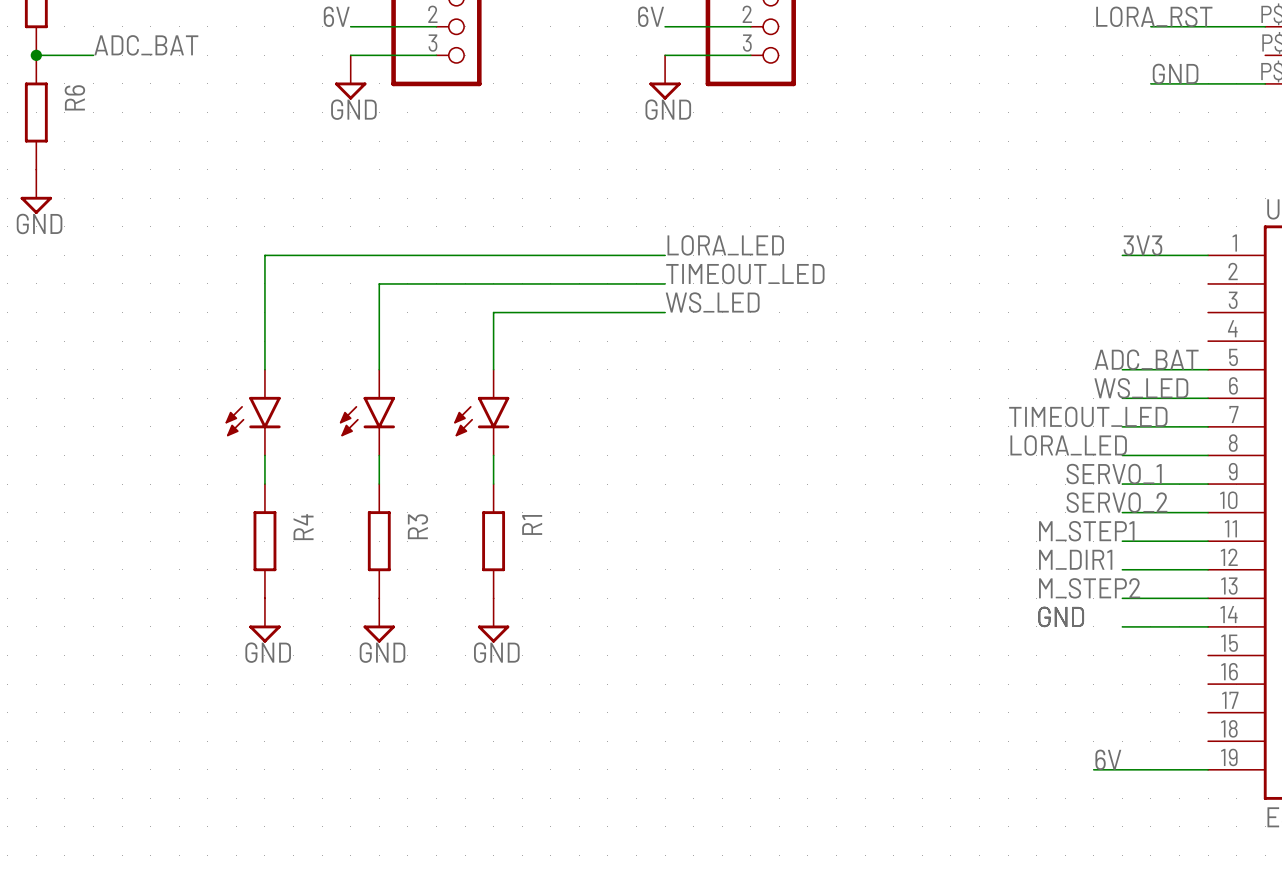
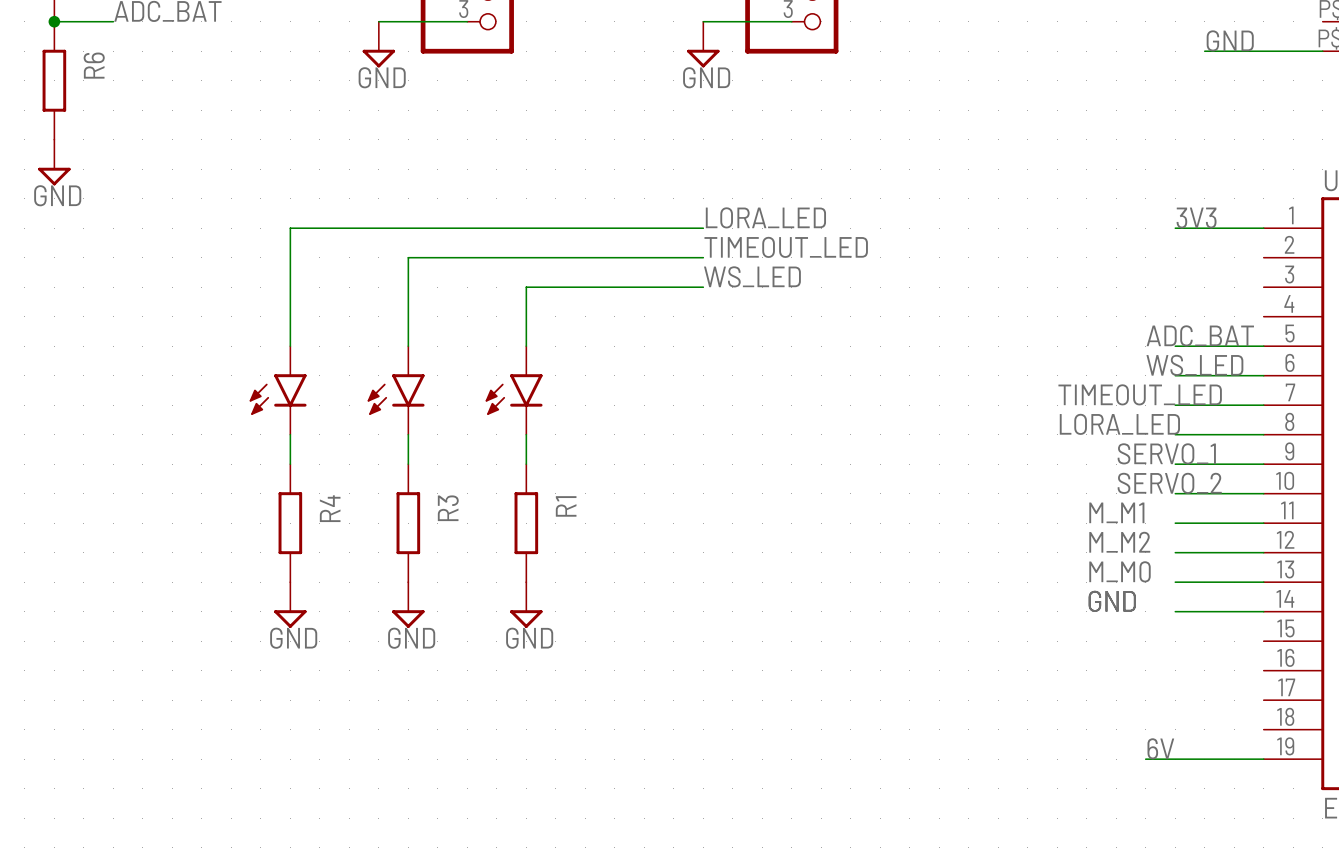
label: M_STEP1 (1086, 531) -> M_M1 (1116, 512)
label: M_DIR1 (1075, 559) -> M_M2 (1119, 542)
label: M_STEP2 (1089, 588) -> M_M0 (1119, 571)

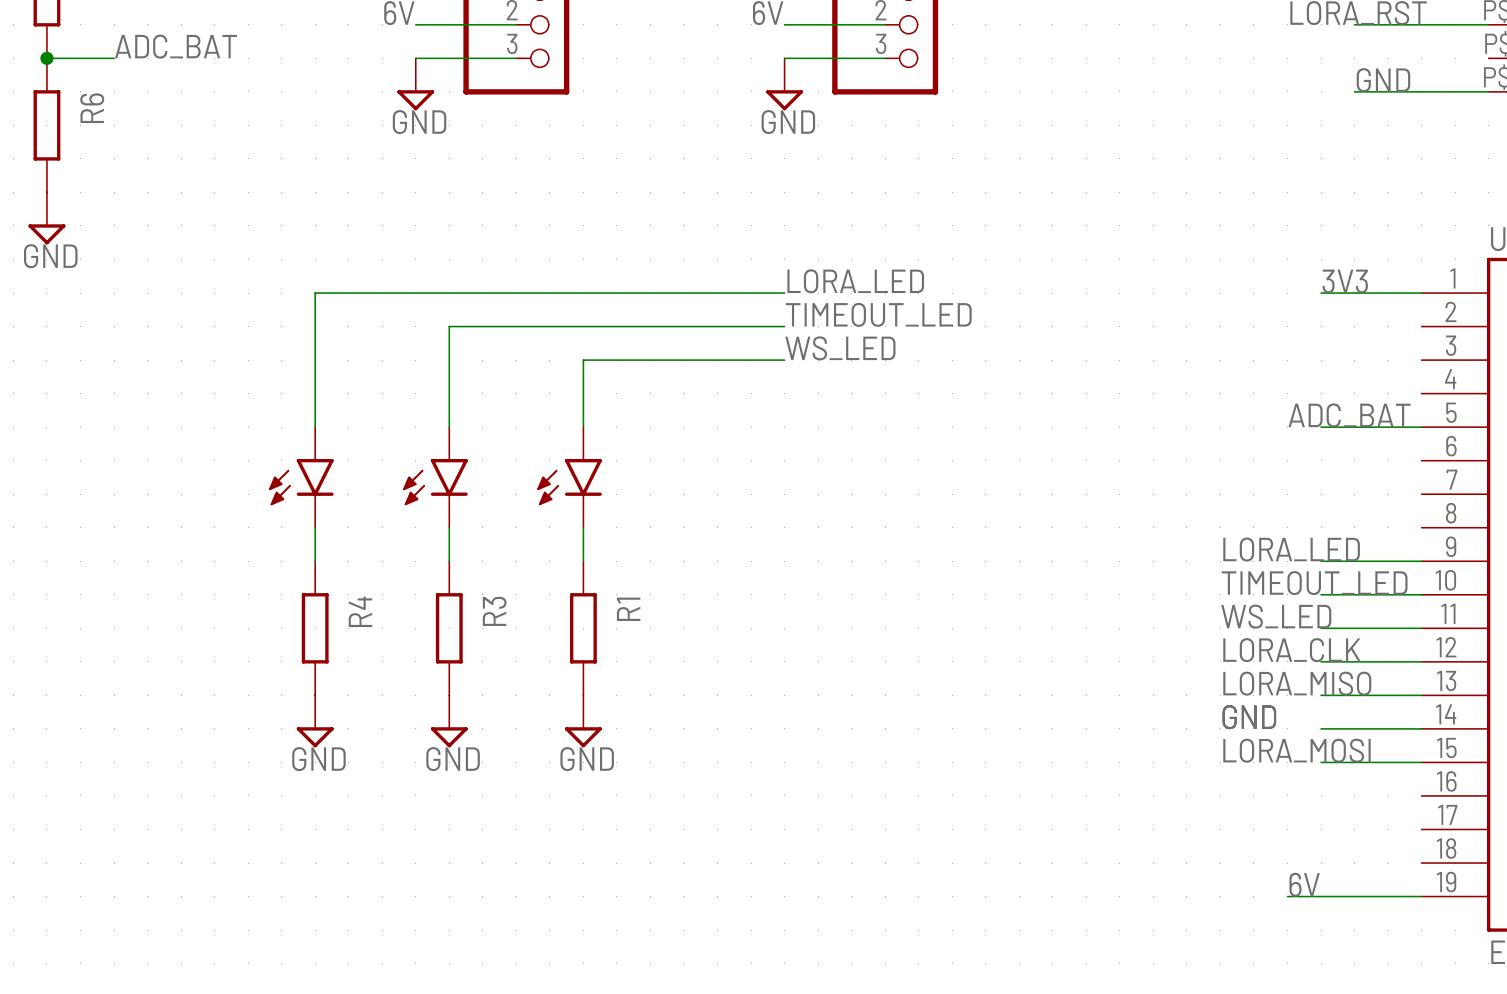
label: WS_LED (1194, 365) -> none
wire: (1175, 375) (1263, 375) -> none
label position: TIMEOUT_LED (1140, 394) -> TIMEOUT_LED (1314, 583)
wire: (1175, 405) (1263, 405) -> none
label position: LORA_LED (1119, 424) -> LORA_LED (1291, 549)
wire: (1175, 434) (1263, 434) -> (1321, 762) (1421, 762)
label: SERVO_1 (1166, 453) -> none
label: SERVO_2 (1169, 483) -> none
label: M_M1 (1116, 512) -> WS_LED (1276, 616)
label: M_M2 (1119, 542) -> LORA_CLK (1292, 650)
label: M_M0 (1119, 571) -> LORA_MISO (1297, 683)
label: none -> LORA_MOSI (1296, 750)

